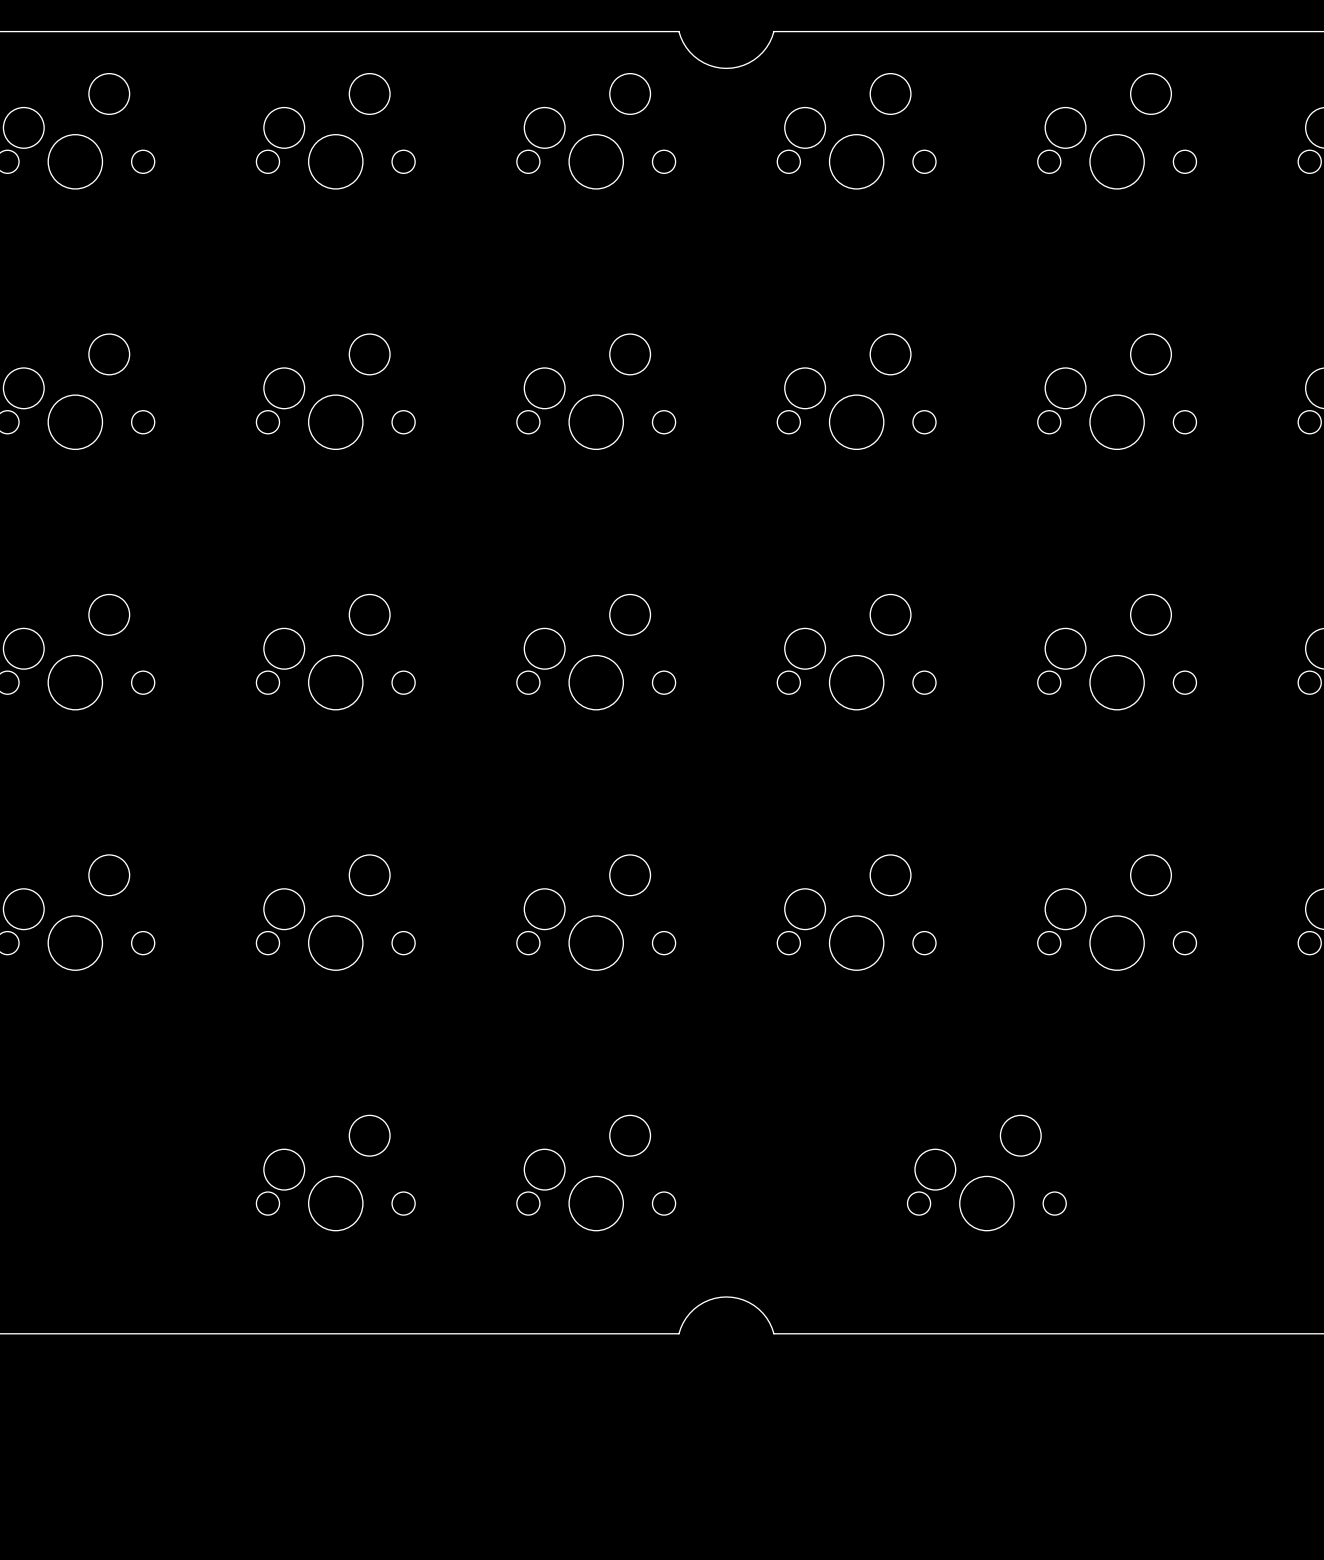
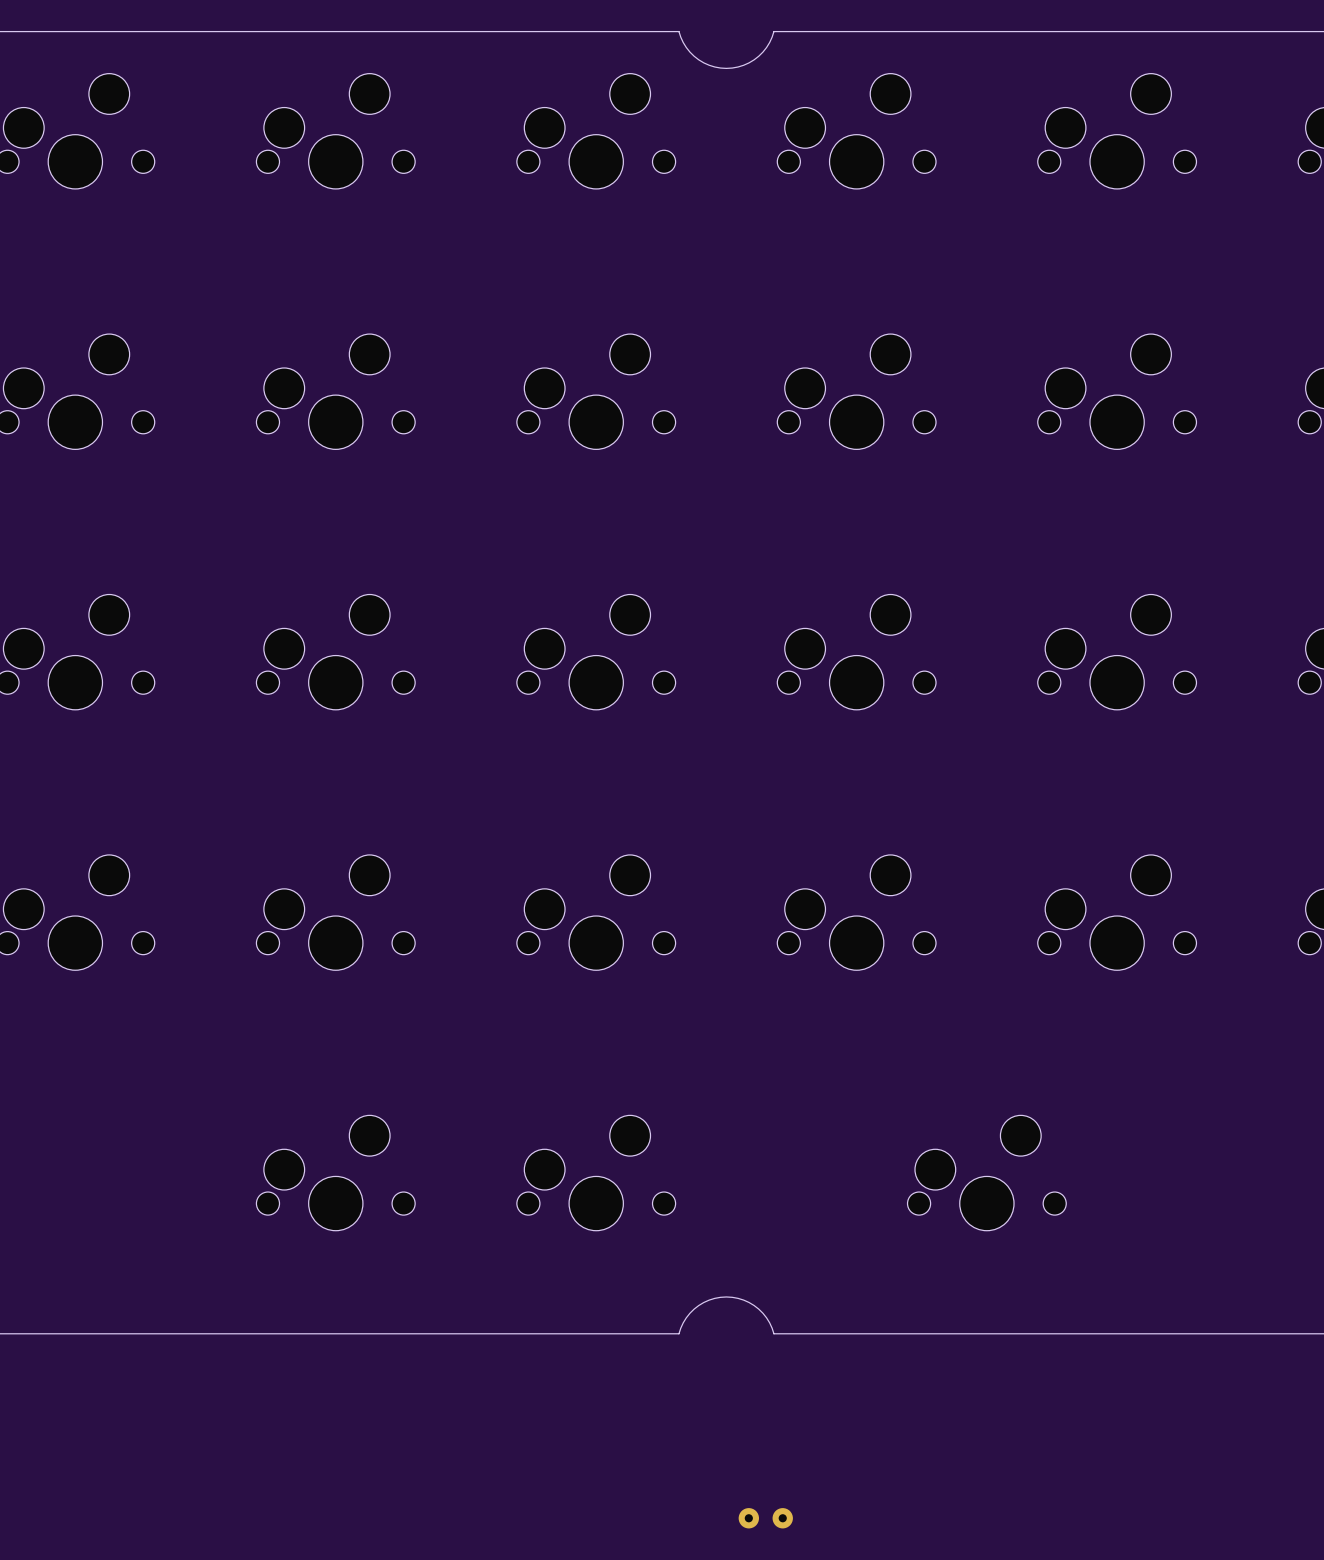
part: none -> (765, 1518)

